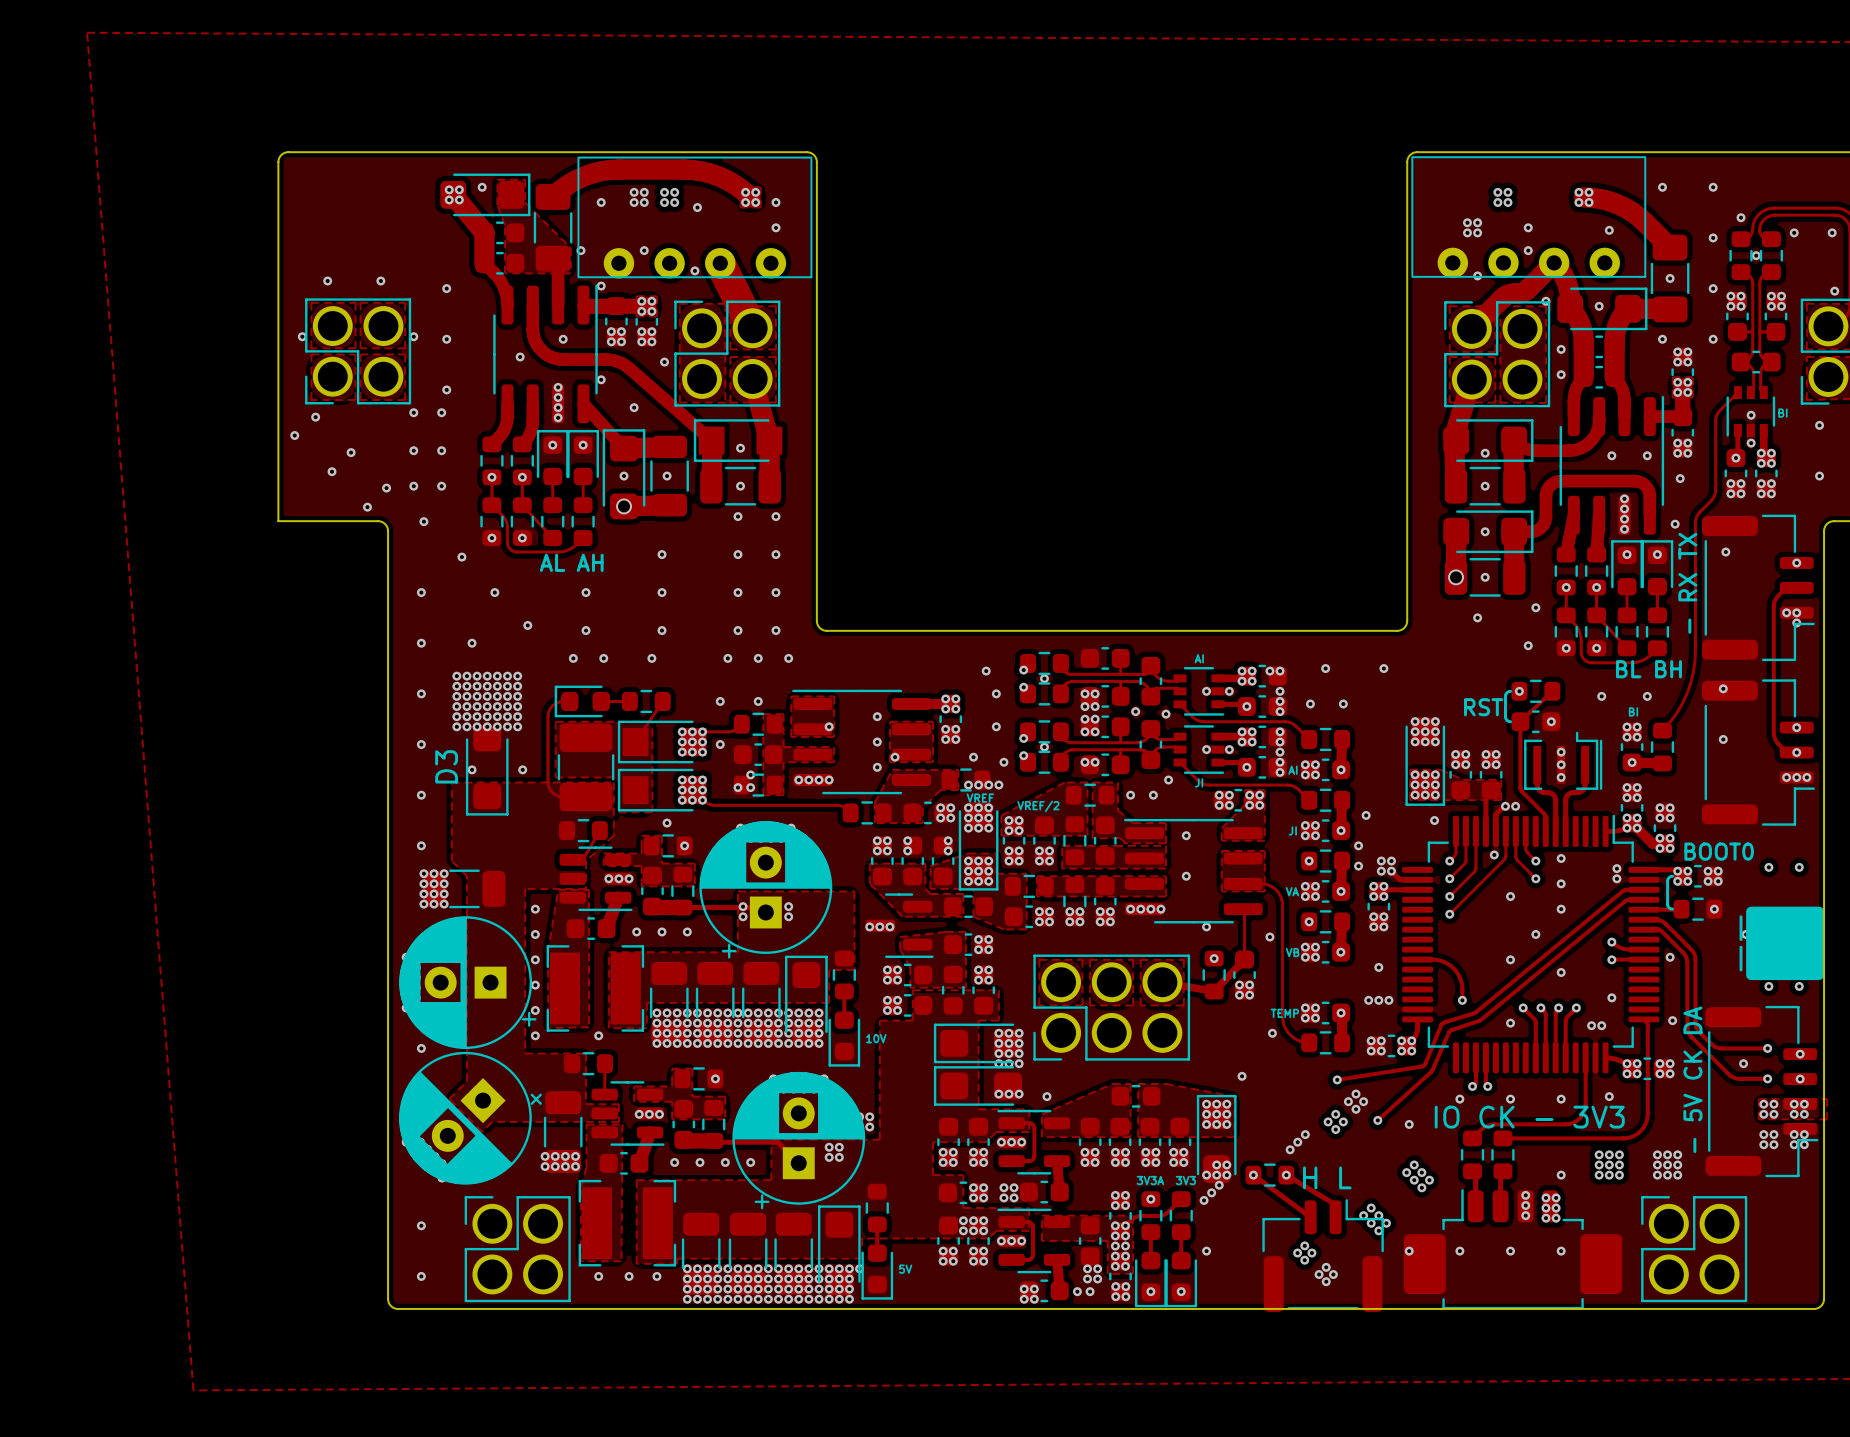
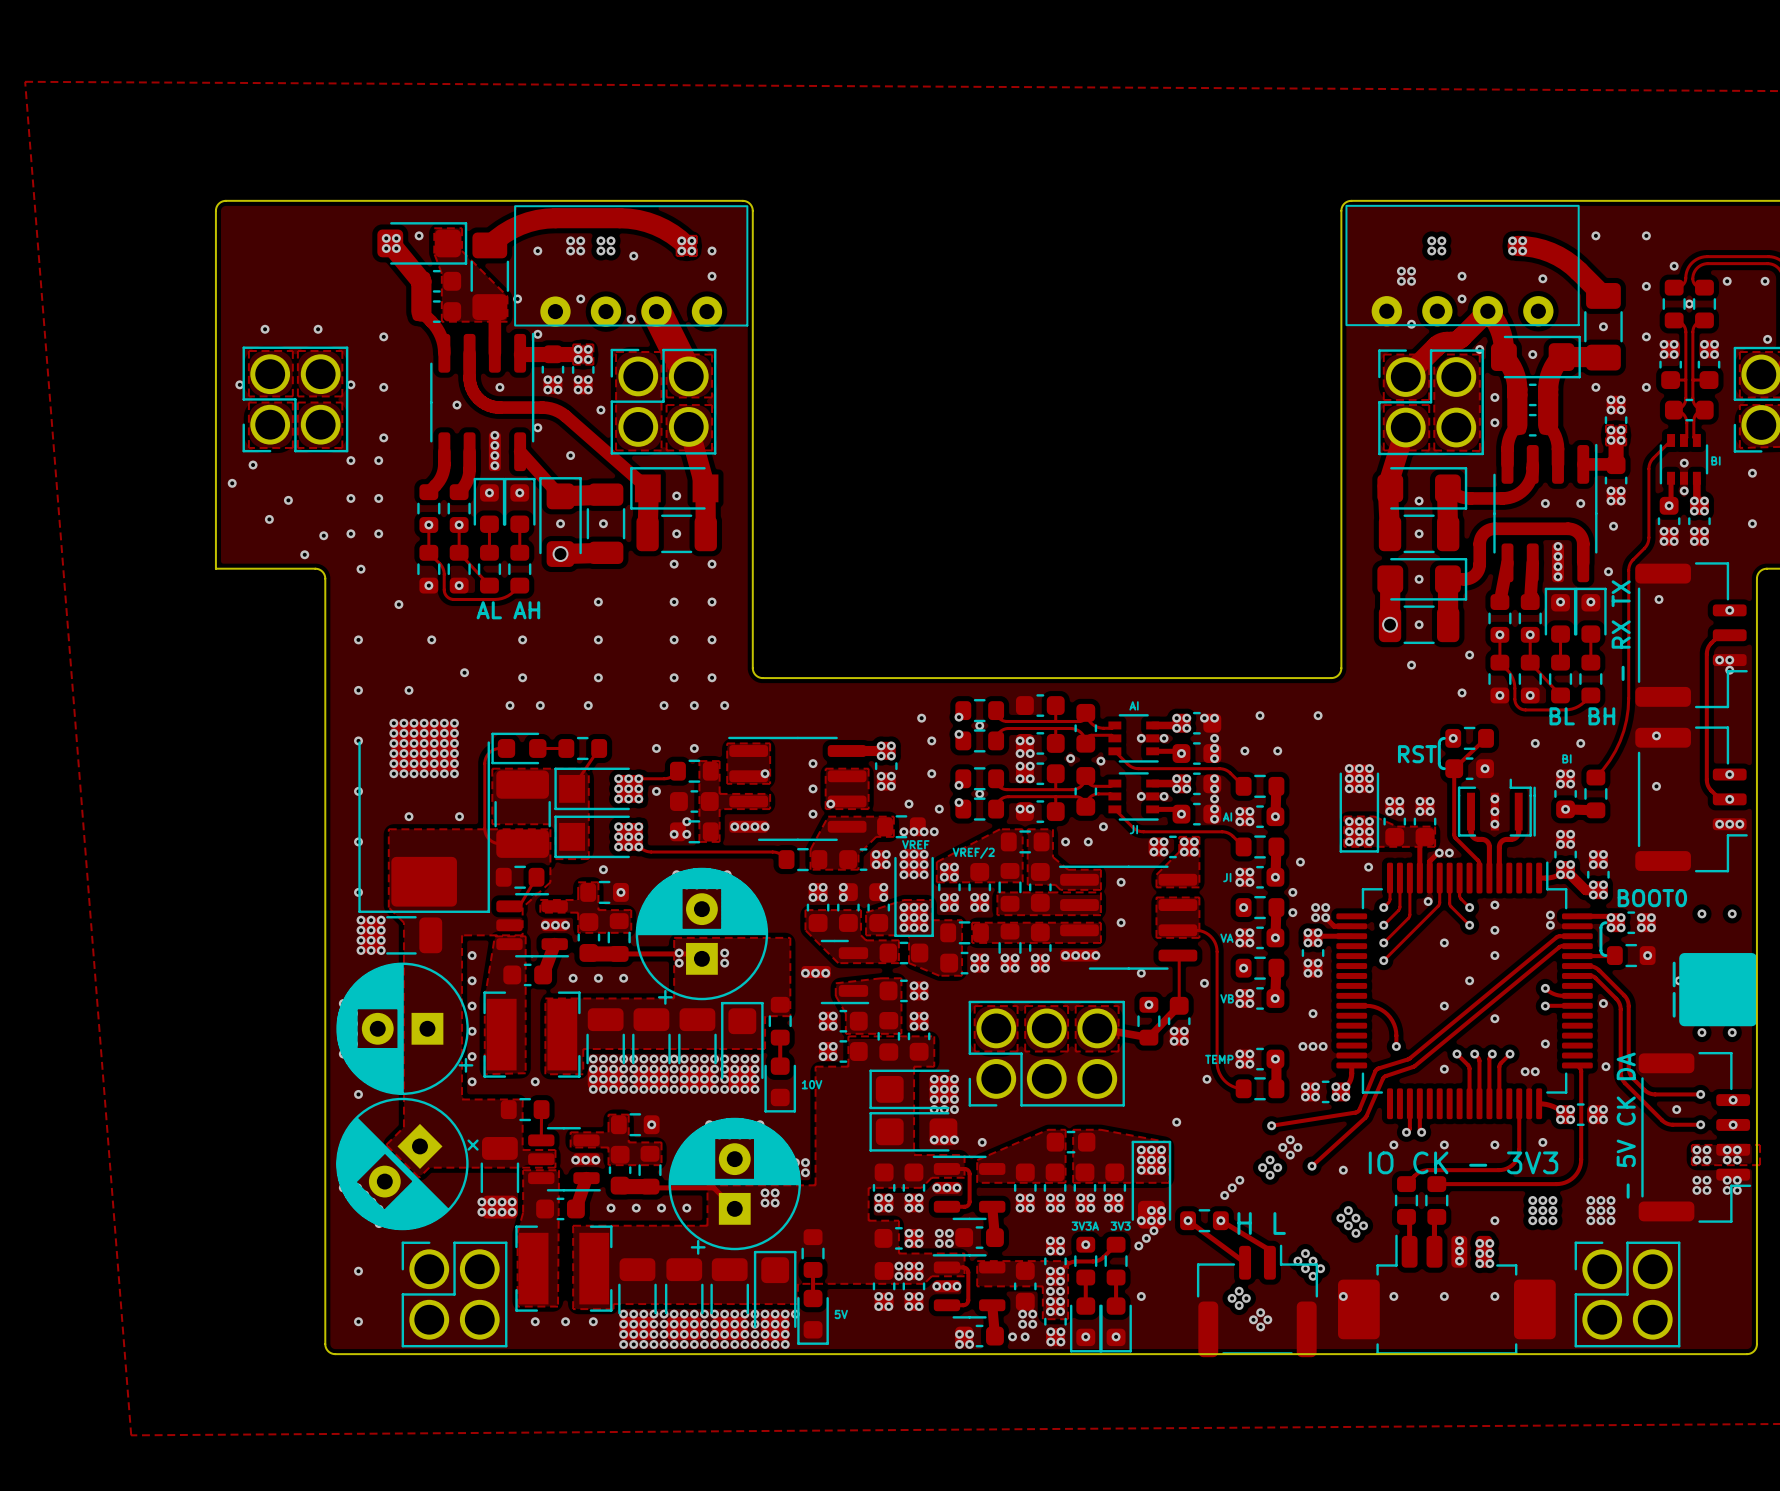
D3: (487, 770) -> none
part: none -> (424, 817)

